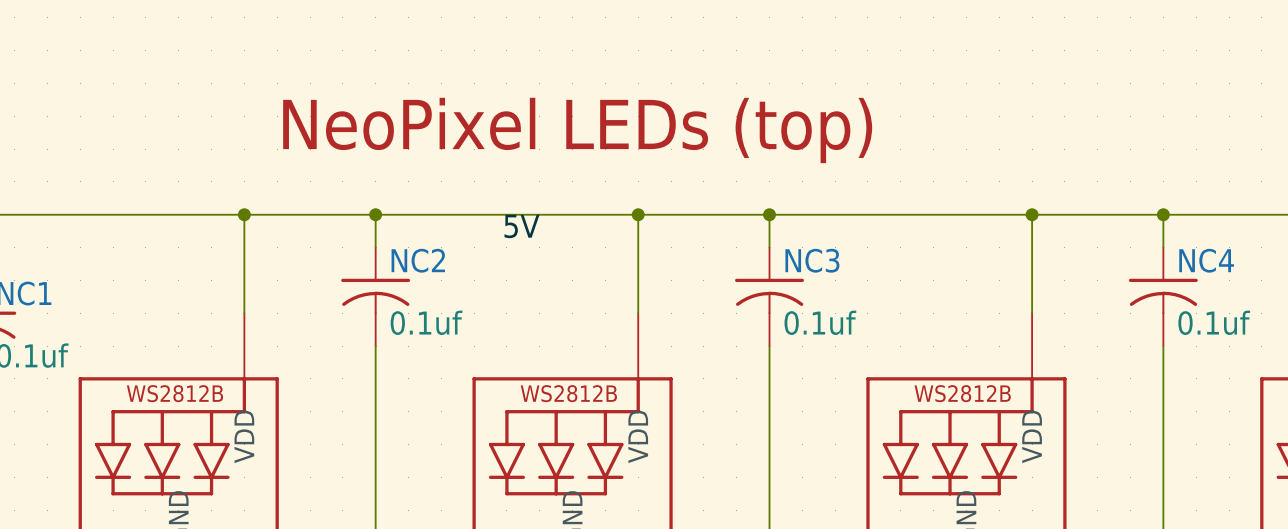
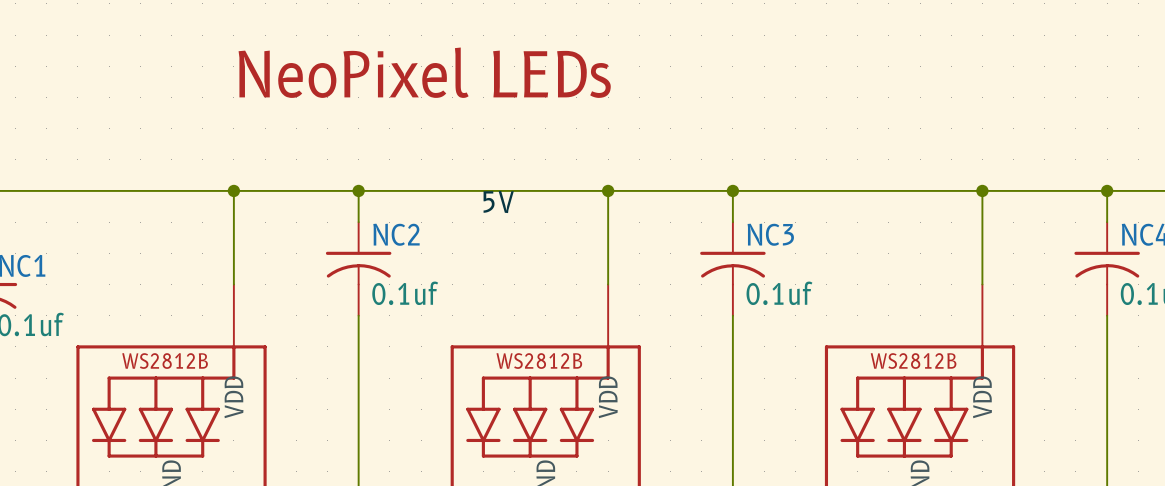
text: NeoPixel LEDs (top) (577, 130) -> NeoPixel LEDs (424, 72)

